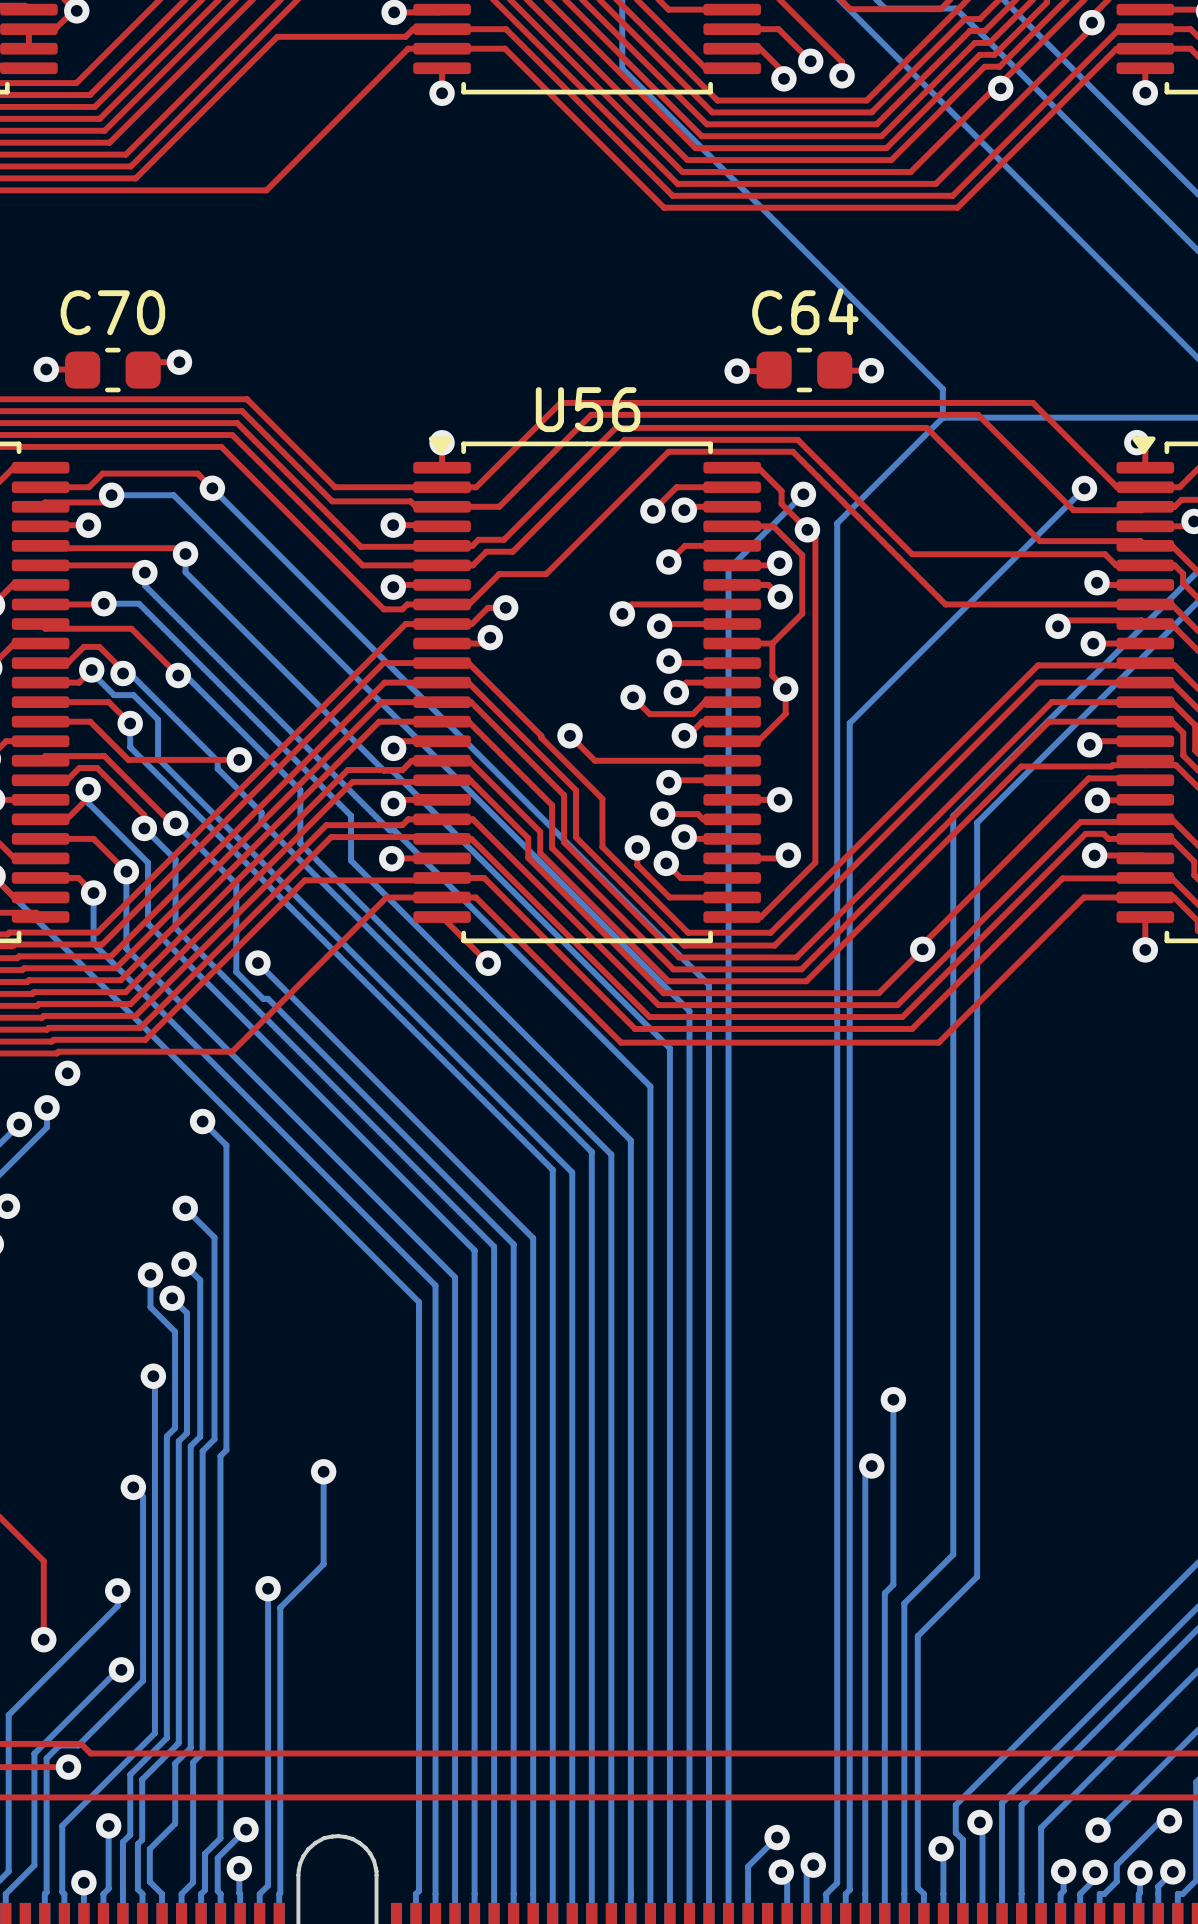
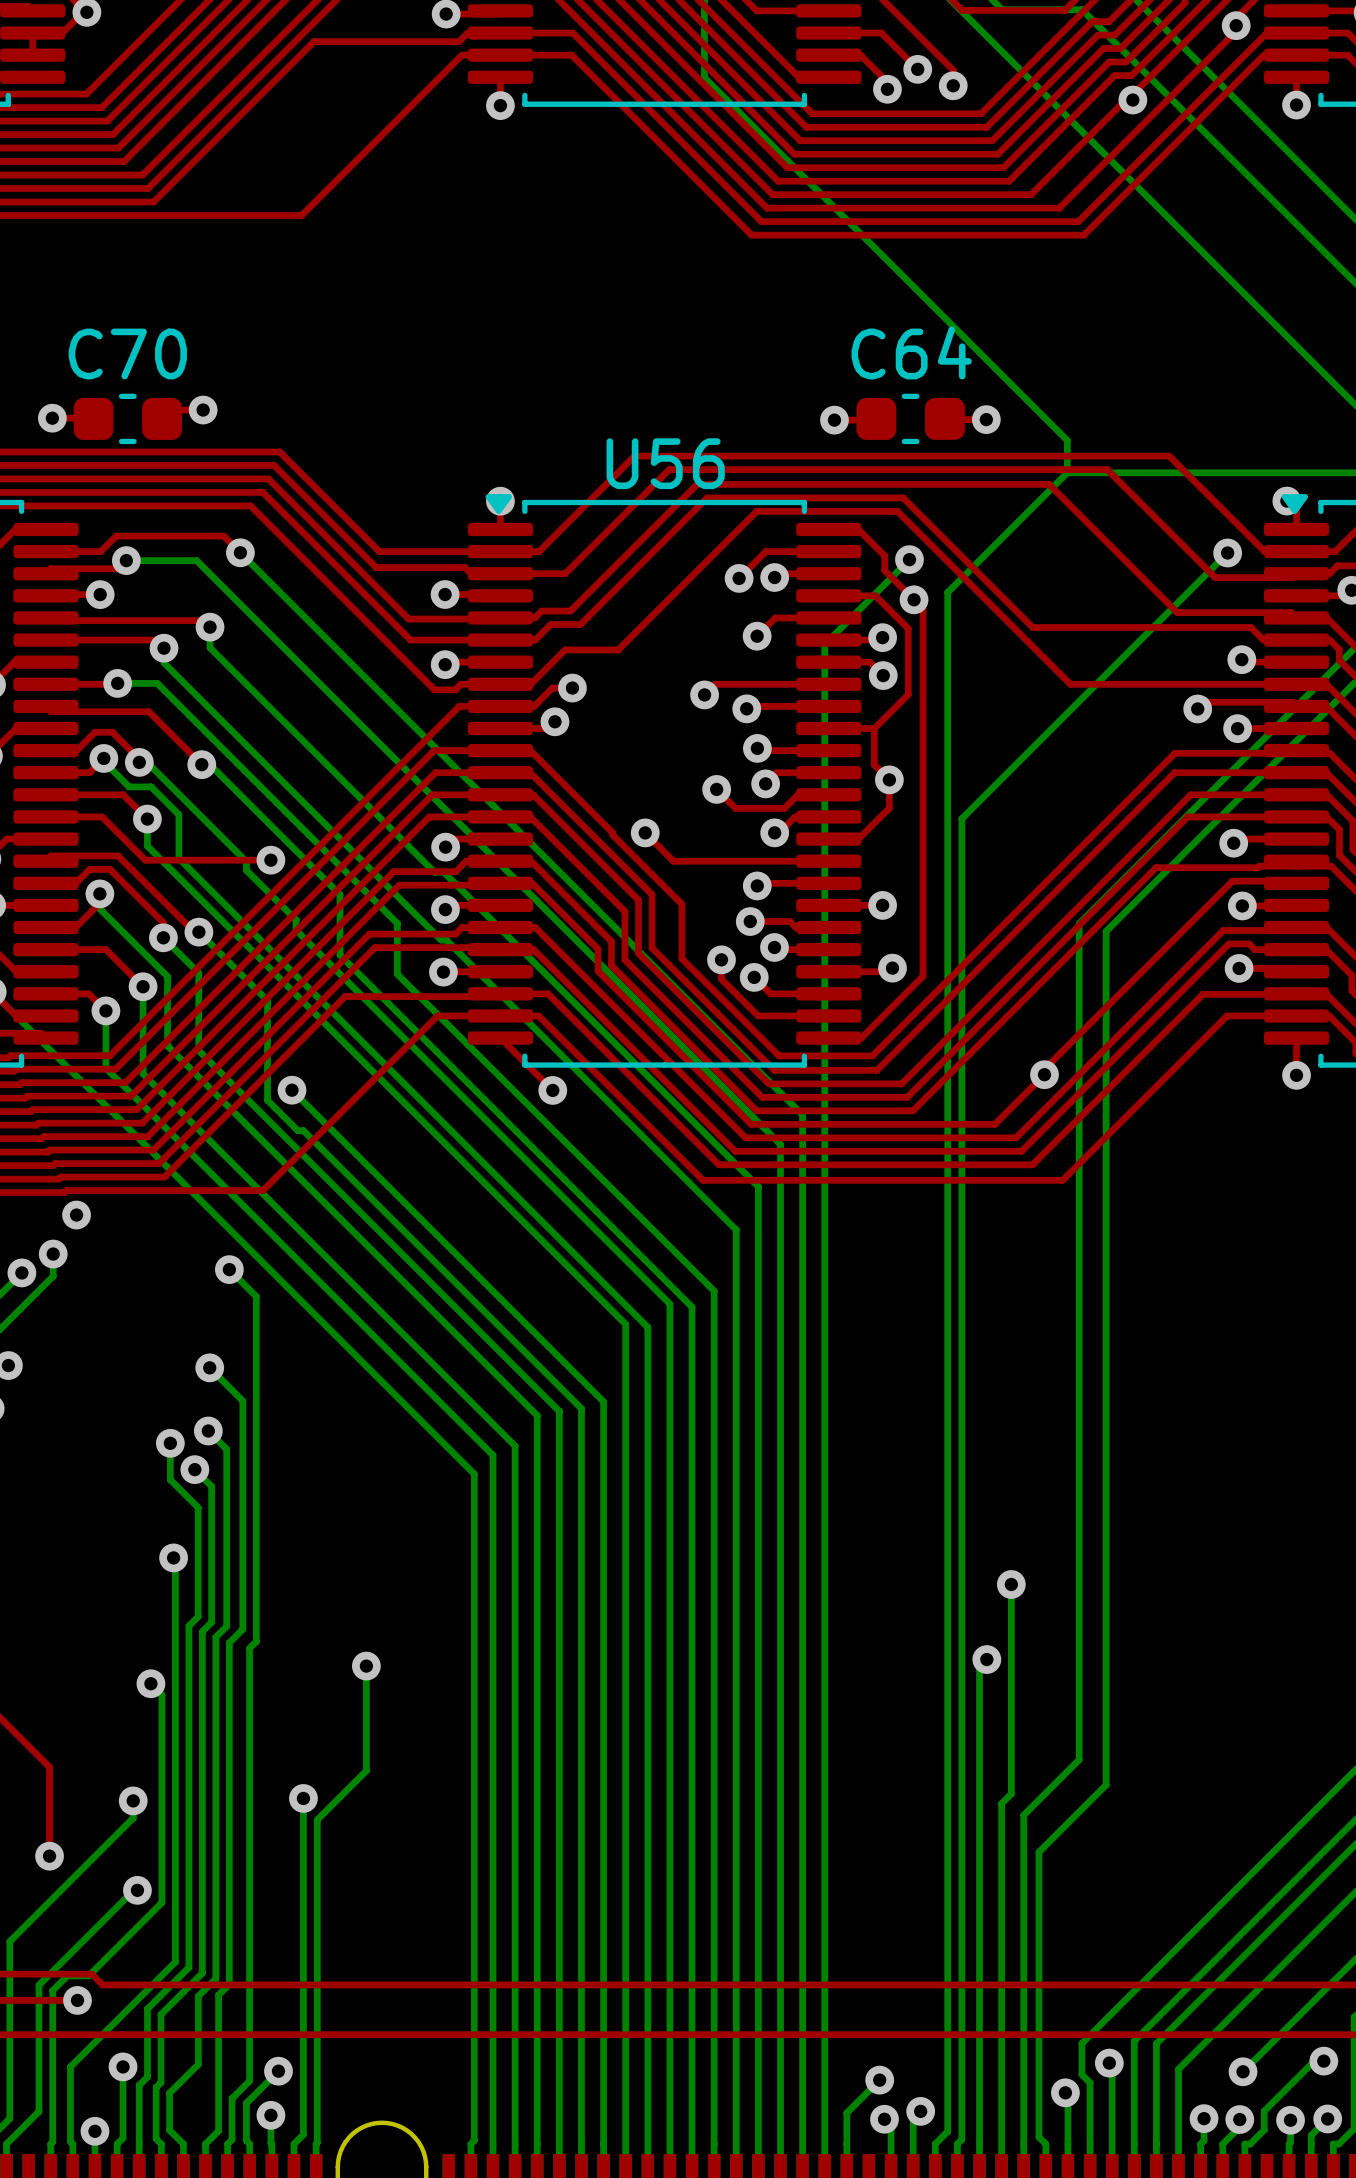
board edge: (376, 1913) (376, 1871) (374, 1861) (365, 1847) (359, 1842) (352, 1838) (338, 1836) (324, 1838) (315, 1843) (303, 1856) (298, 1869) (298, 1914) -> (426, 2166) (423, 2151) (415, 2137) (402, 2127) (382, 2122) (366, 2125) (352, 2133) (340, 2151) (337, 2166)

